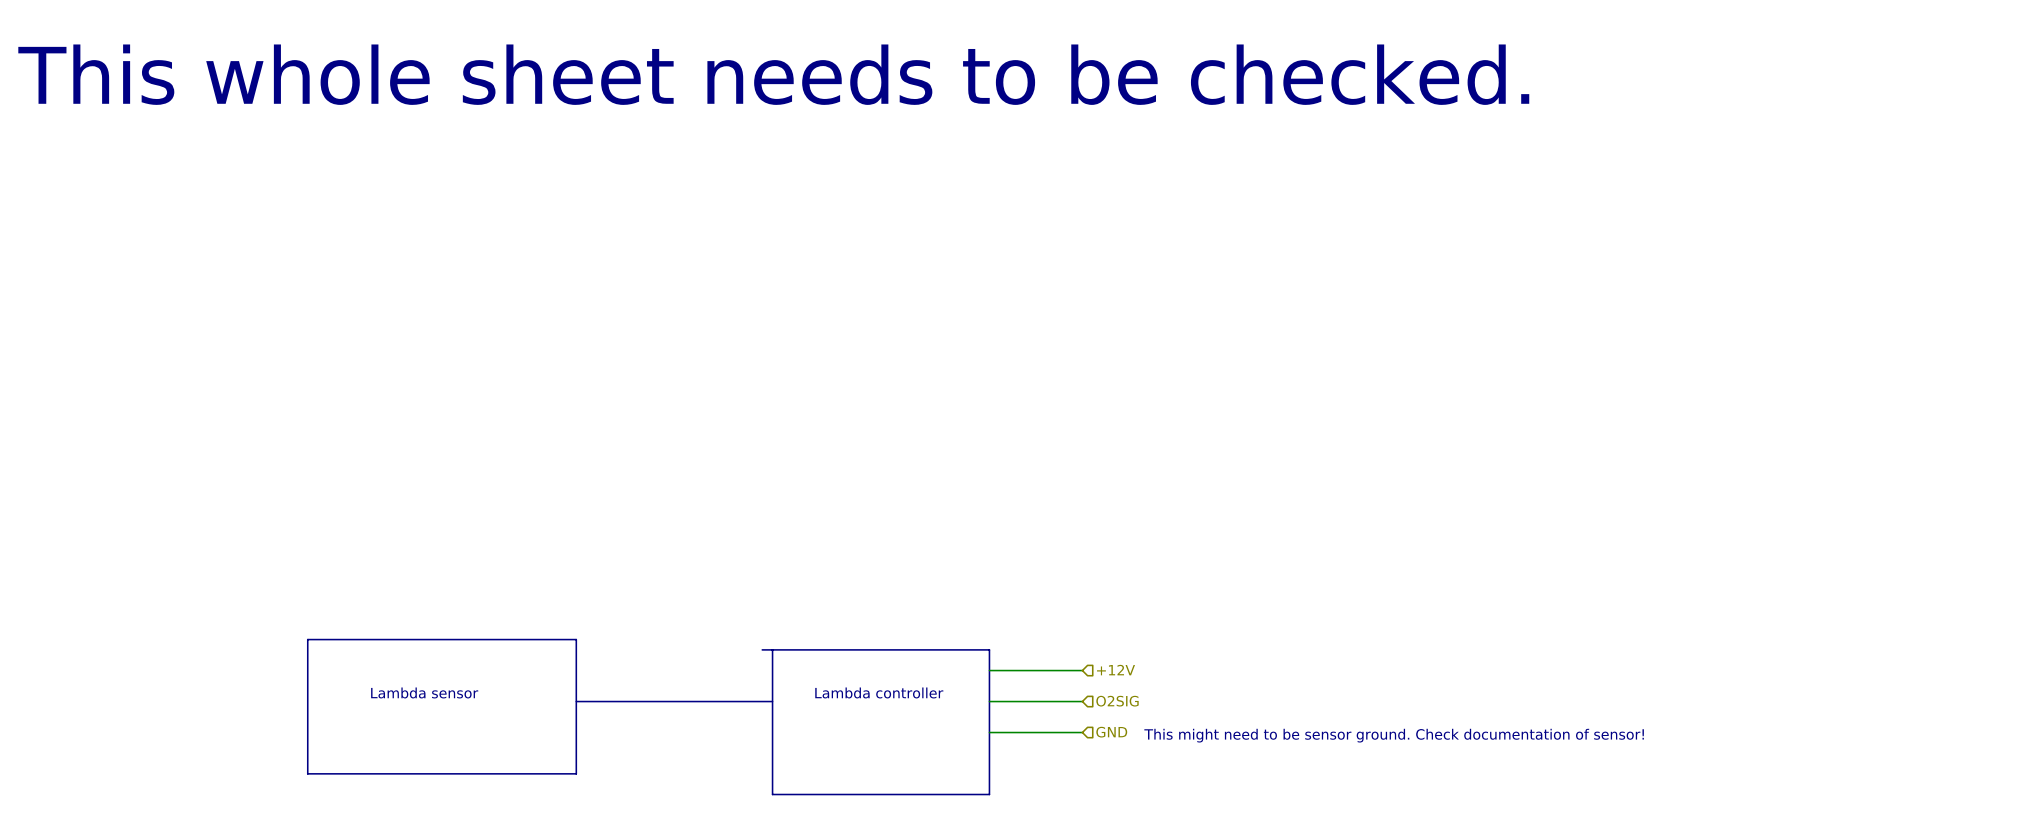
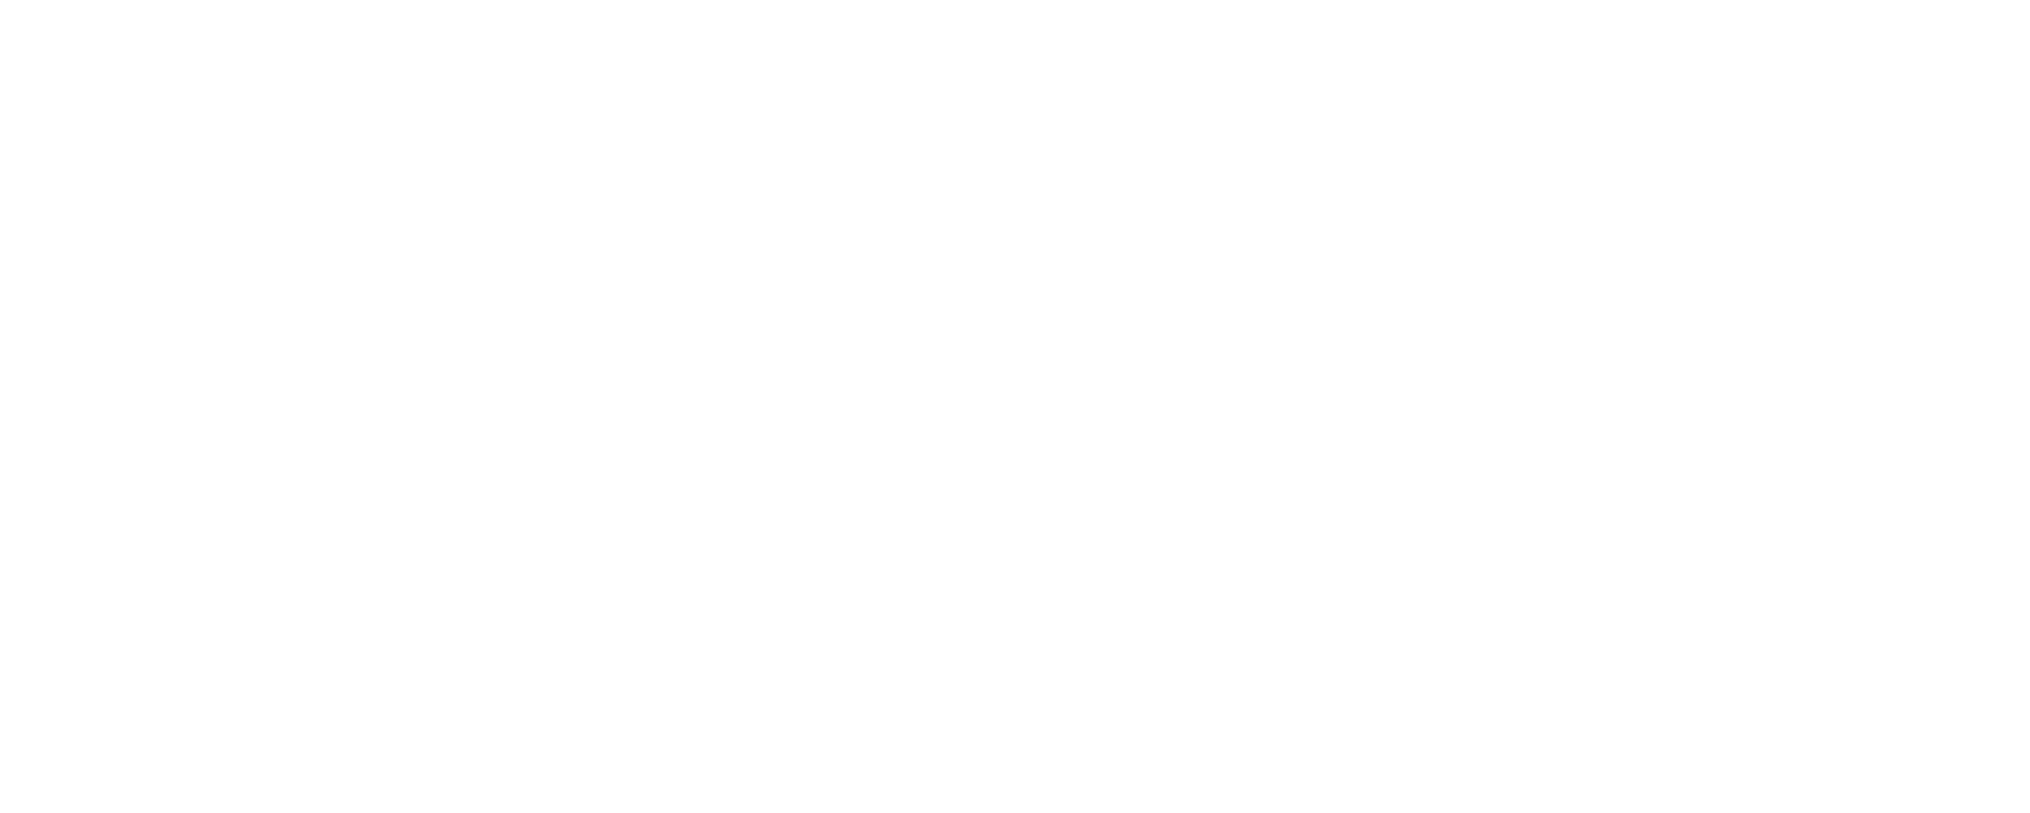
text: This whole sheet needs to be checked. (773, 74) -> none
line: (307, 639) (307, 773) (576, 773) (576, 639) (307, 639) -> none
line: (762, 649) (989, 649) (989, 794) (772, 794) (772, 649) -> none
wire: (989, 670) (1082, 670) -> none
hierarchical label: +12V (1116, 670) -> none
text: Lambda sensor (424, 692) -> none
text: Lambda controller (879, 692) -> none
bus: (576, 701) (772, 701) -> none
wire: (989, 701) (1082, 701) -> none
hierarchical label: O2SIG (1117, 701) -> none
wire: (989, 732) (1082, 732) -> none
hierarchical label: GND (1111, 732) -> none
text: This might need to be sensor ground. Check documentation of sensor! (1394, 735) -> none

